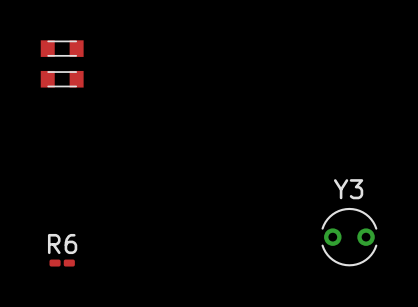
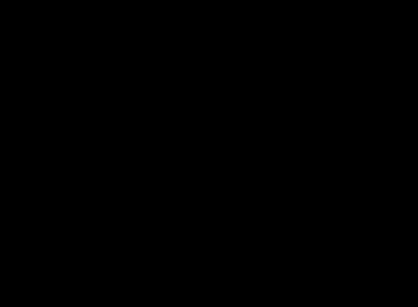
part: (62, 48) -> none
part: (62, 79) -> none
Y3: (349, 237) -> none
R6: (62, 263) -> none

